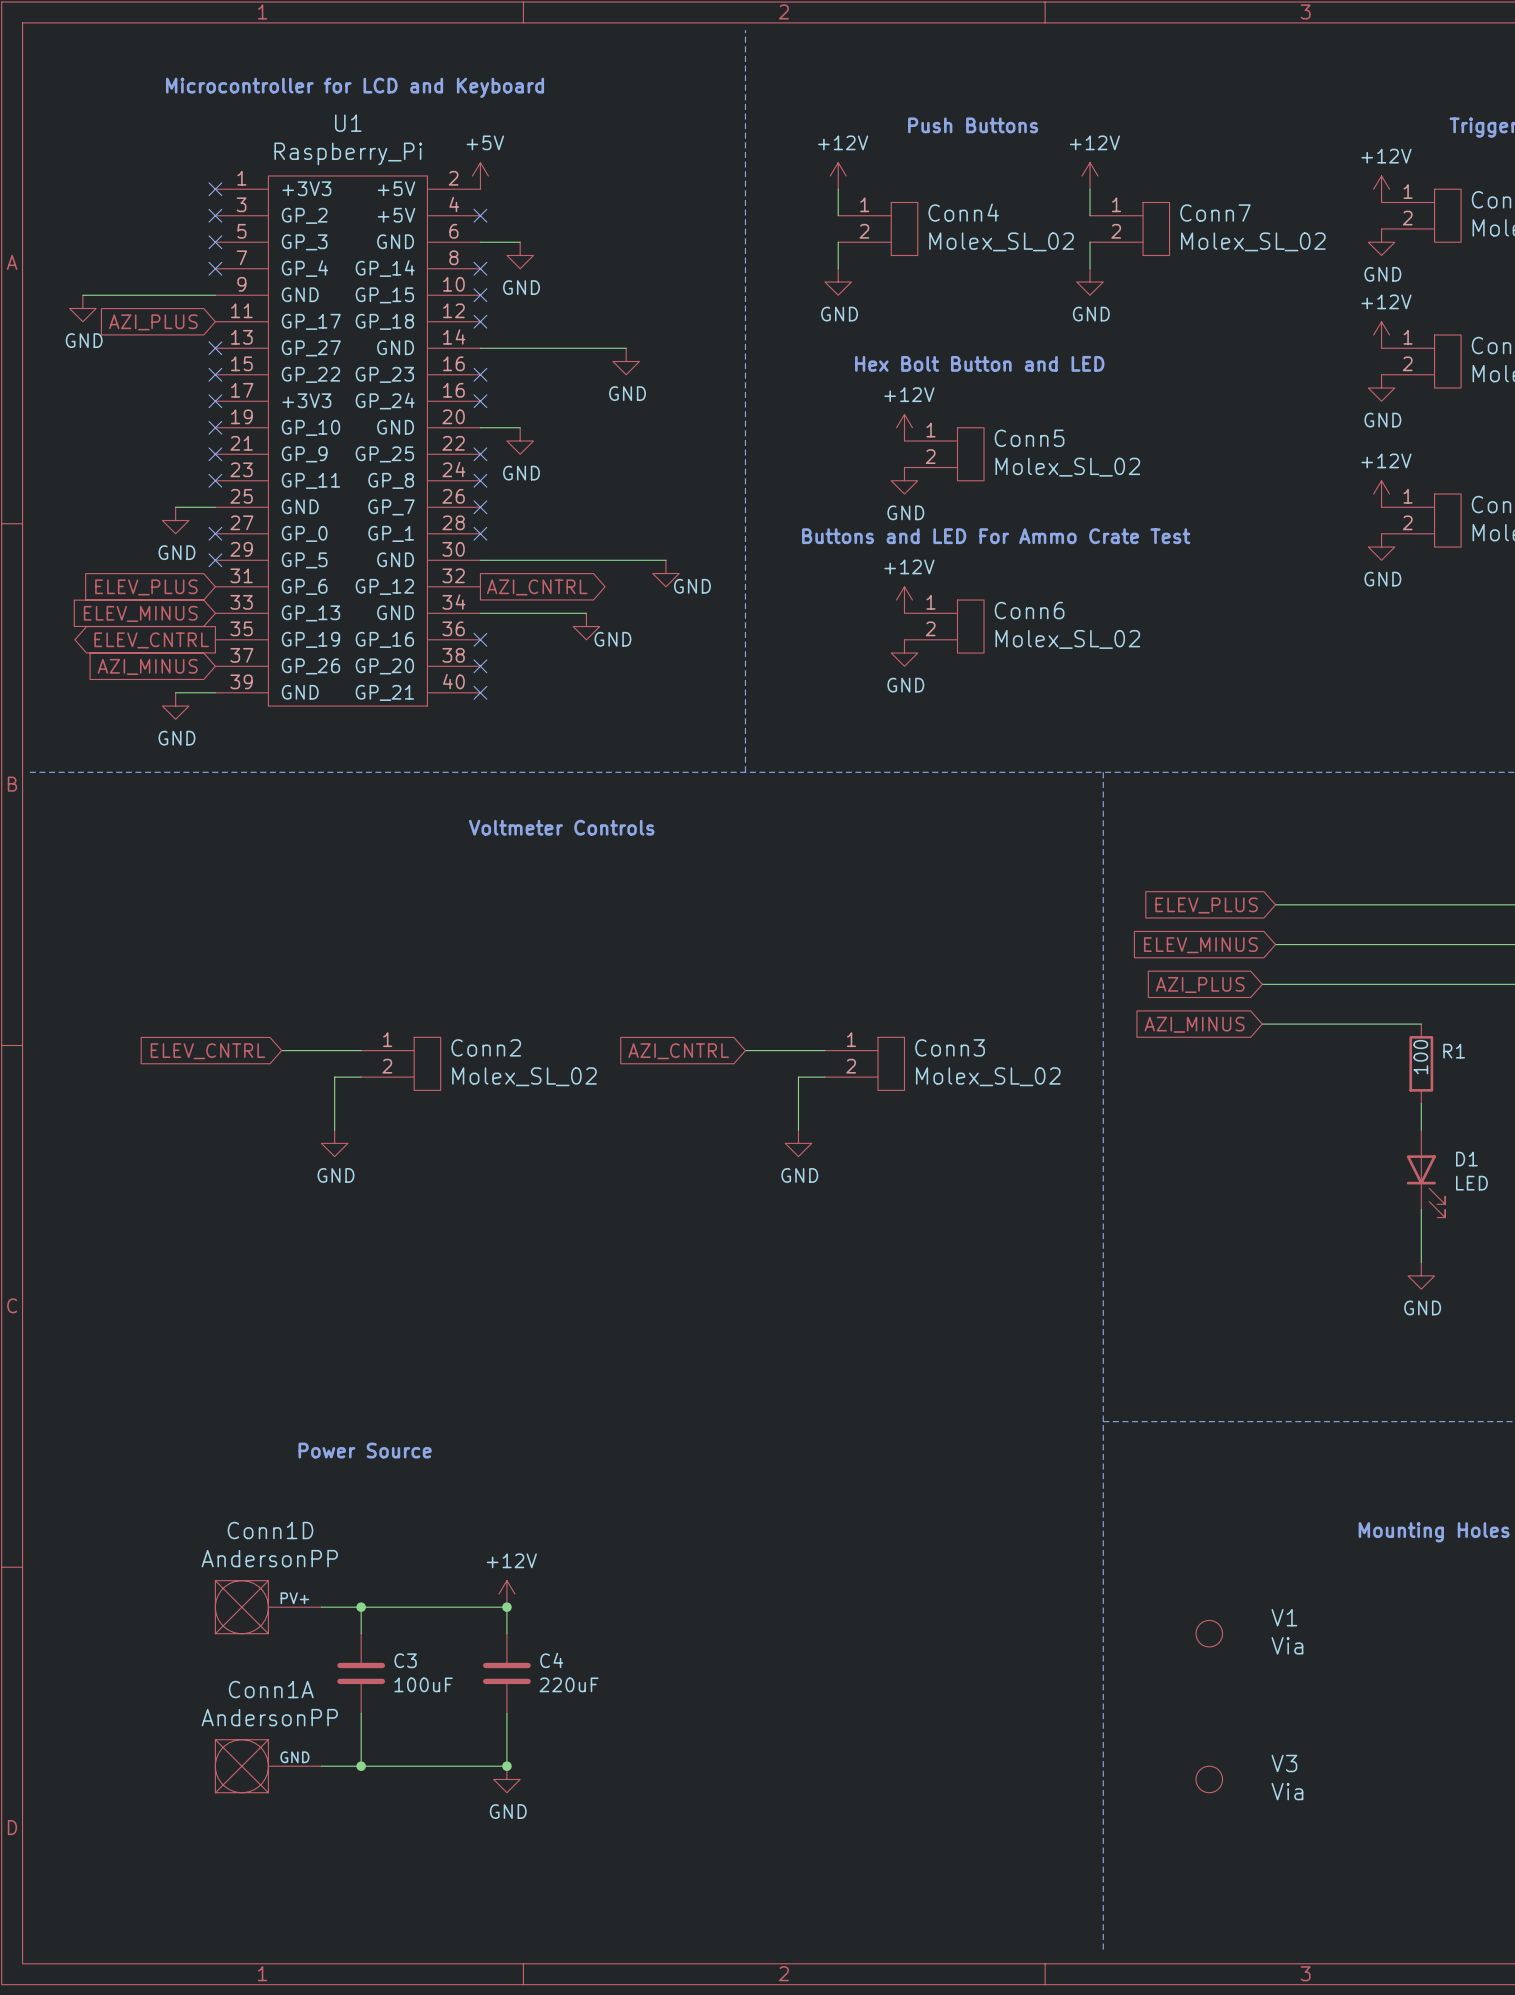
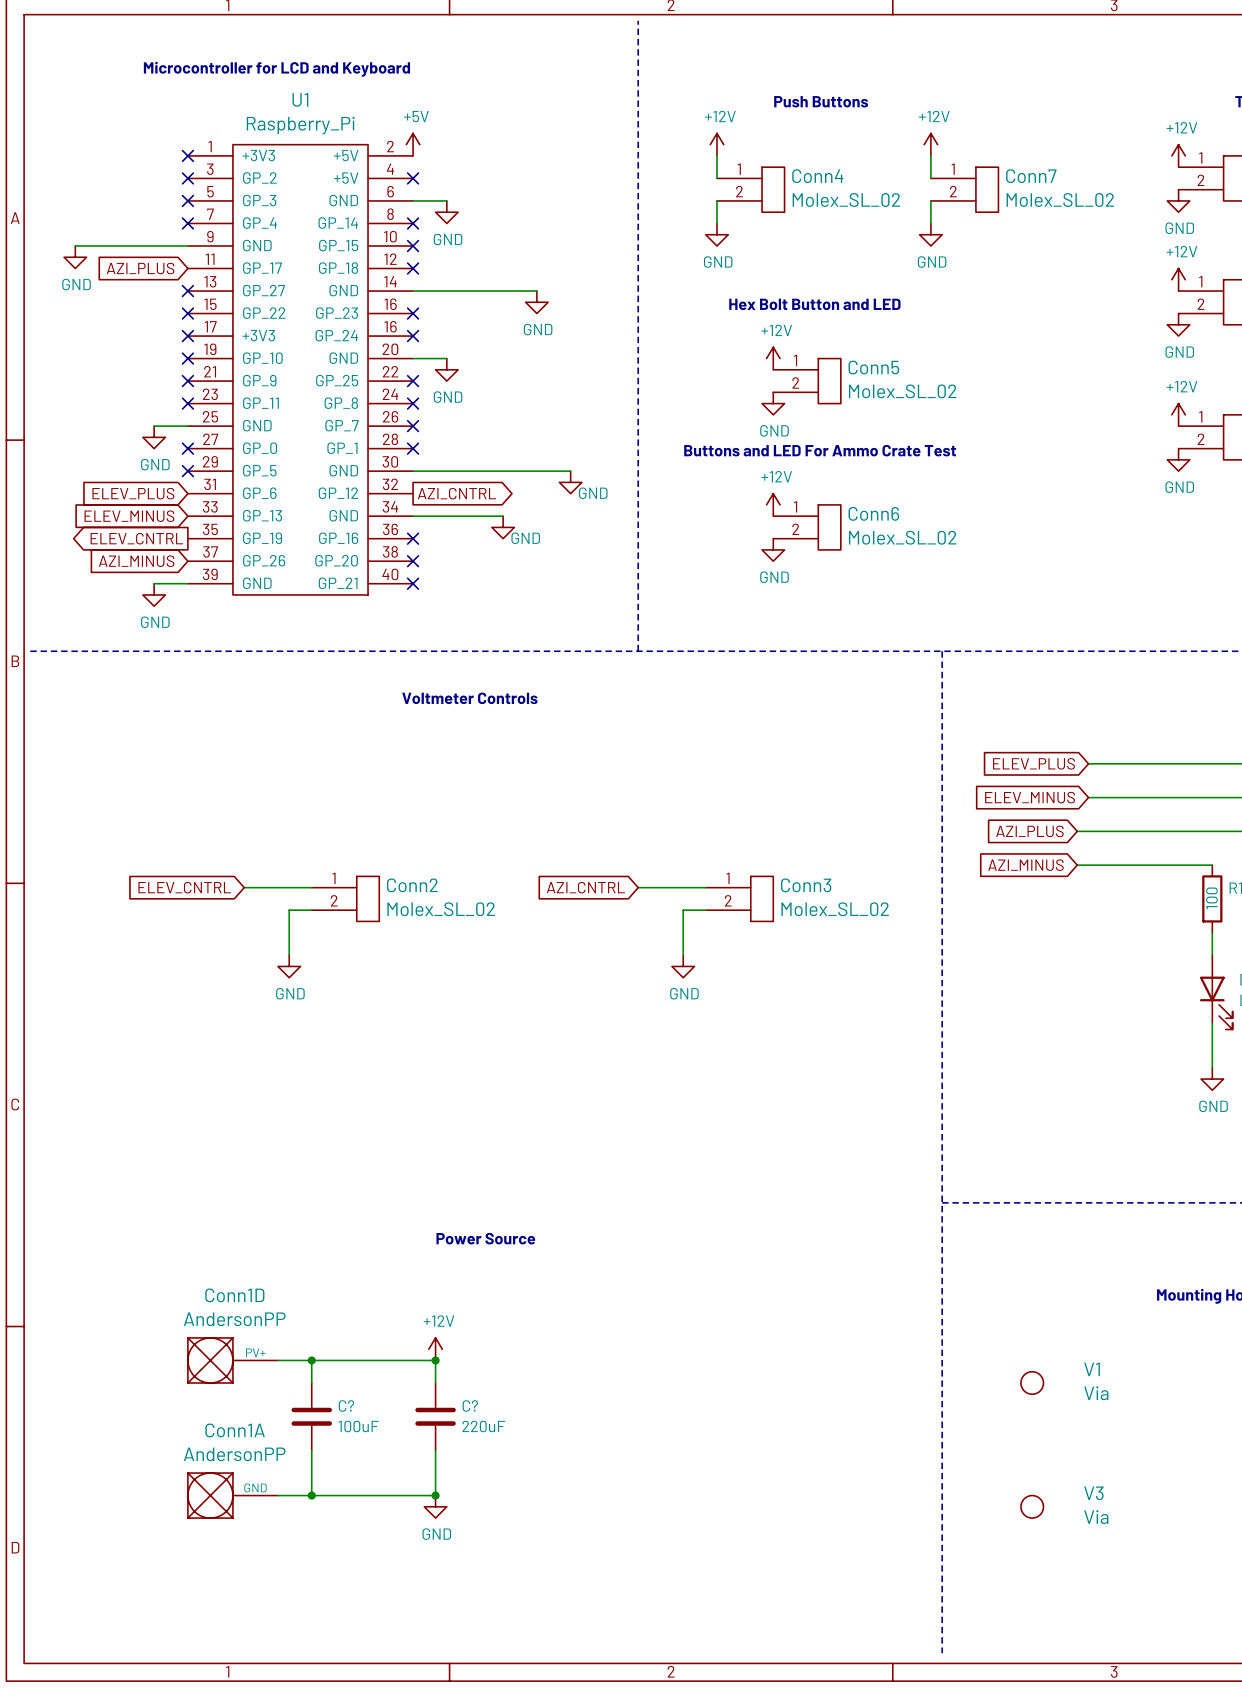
text position: Power Source (365, 1450) -> Power Source (485, 1238)
C3 name: C3 (405, 1660) -> C? (346, 1405)
C4 name: C4 (551, 1660) -> C? (470, 1405)

